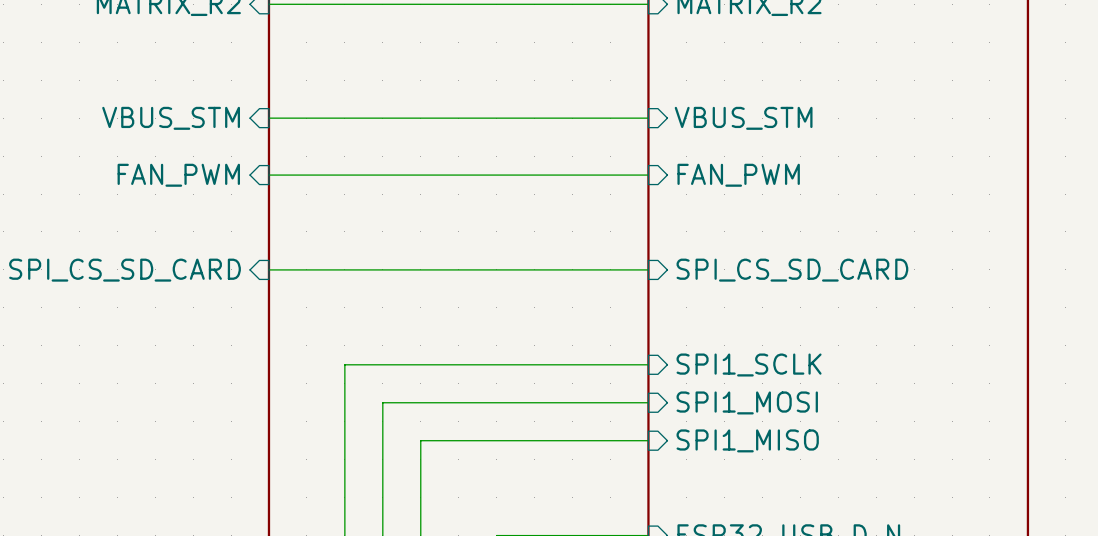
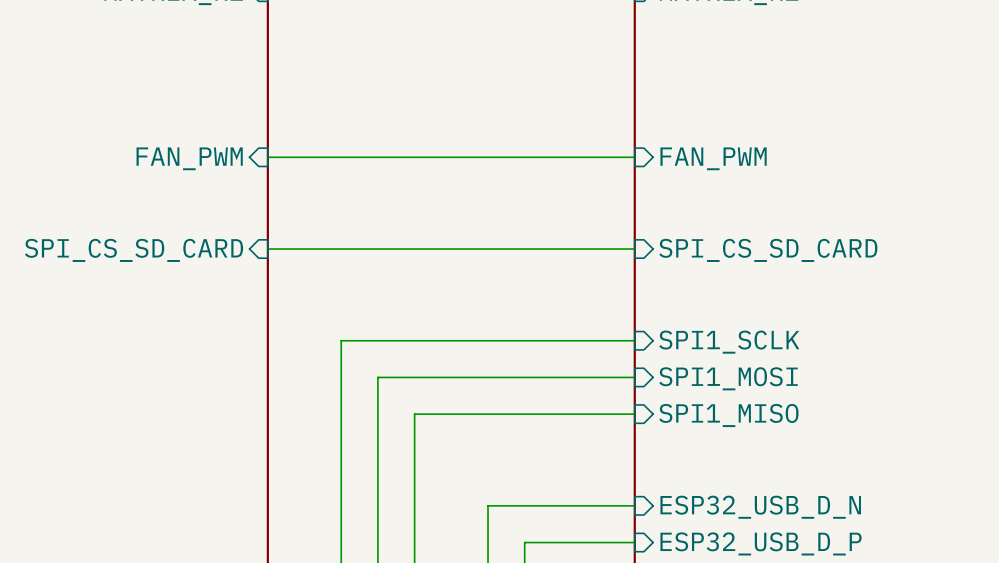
sheet pin: VBUS_STM (171, 118) -> none
wire: (268, 118) (648, 118) -> none
sheet pin: VBUS_STM (743, 118) -> none

